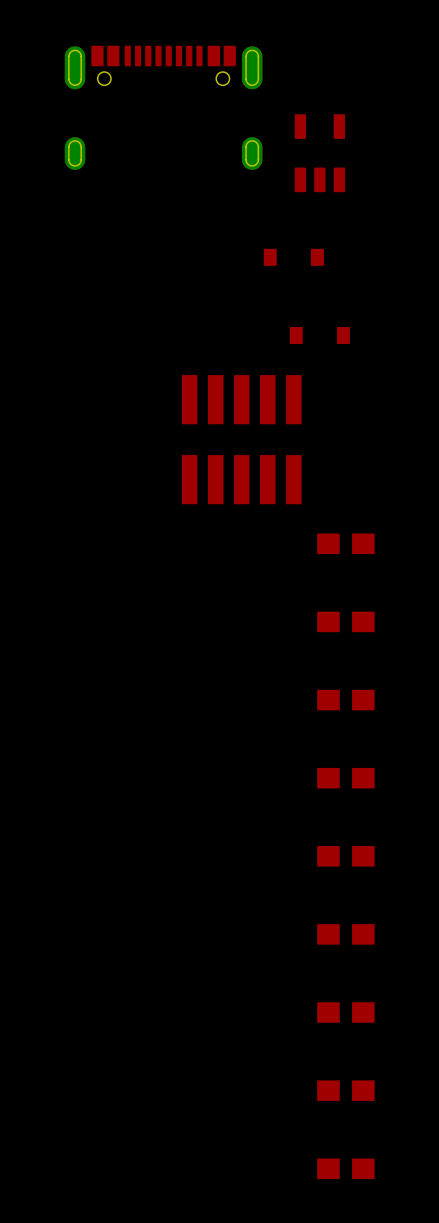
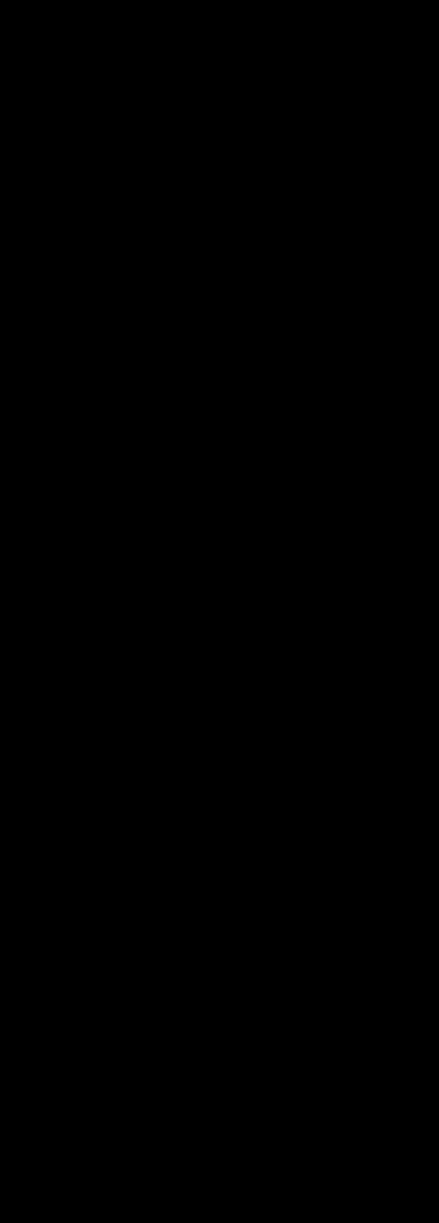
part: (163, 107) -> none
part: (319, 153) -> none
part: (293, 257) -> none
part: (319, 335) -> none
part: (241, 439) -> none
part: (345, 543) -> none
part: (345, 621) -> none
part: (345, 700) -> none
part: (345, 778) -> none
part: (345, 856) -> none
part: (345, 934) -> none
part: (345, 1012) -> none
part: (345, 1090) -> none
part: (345, 1168) -> none

